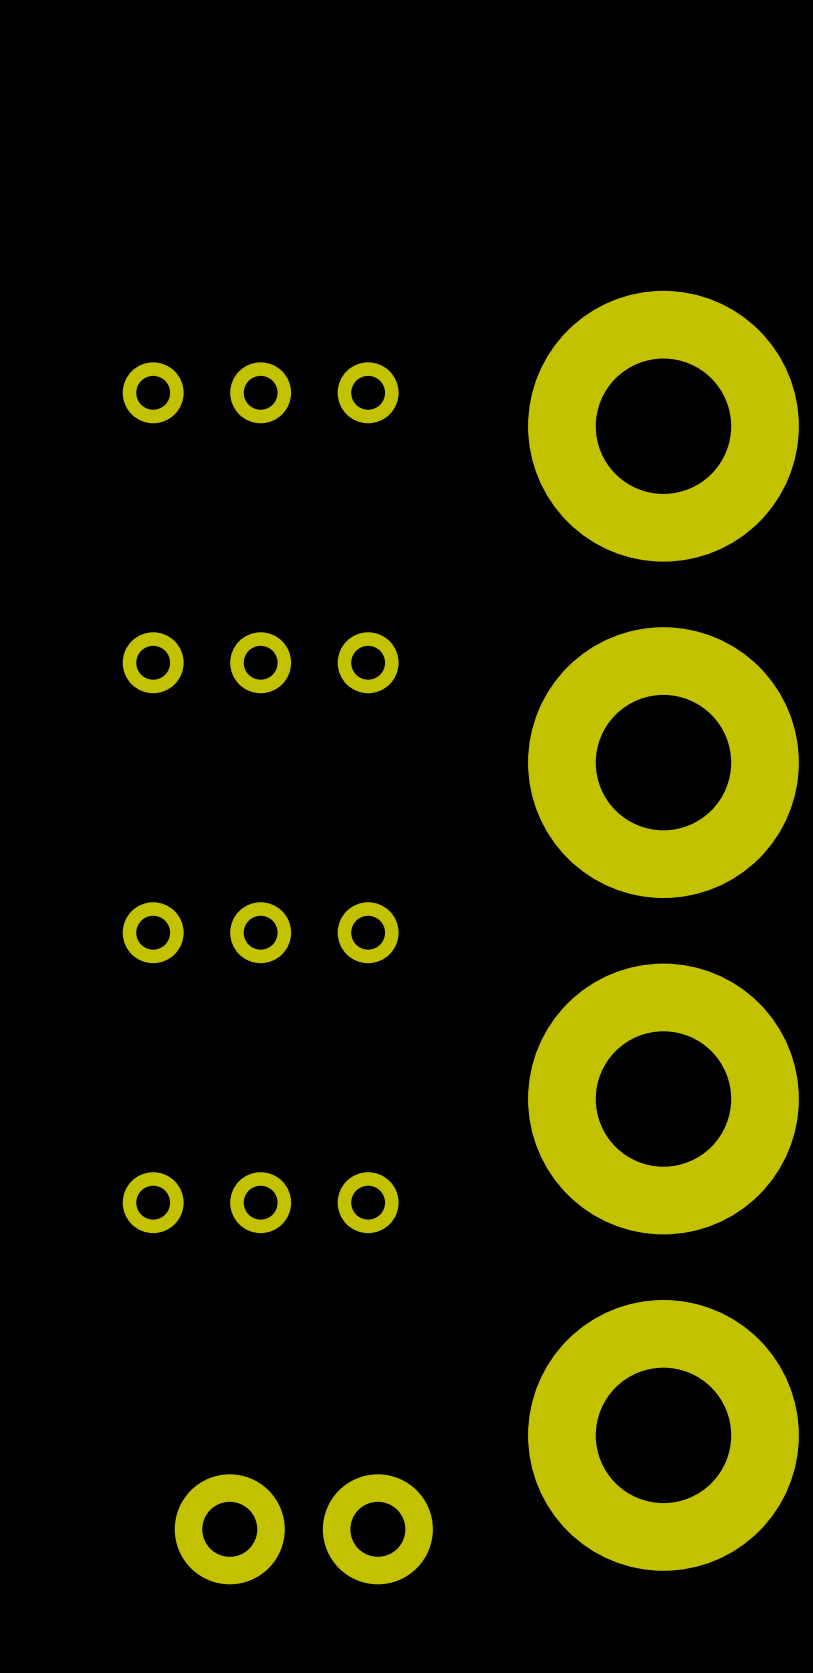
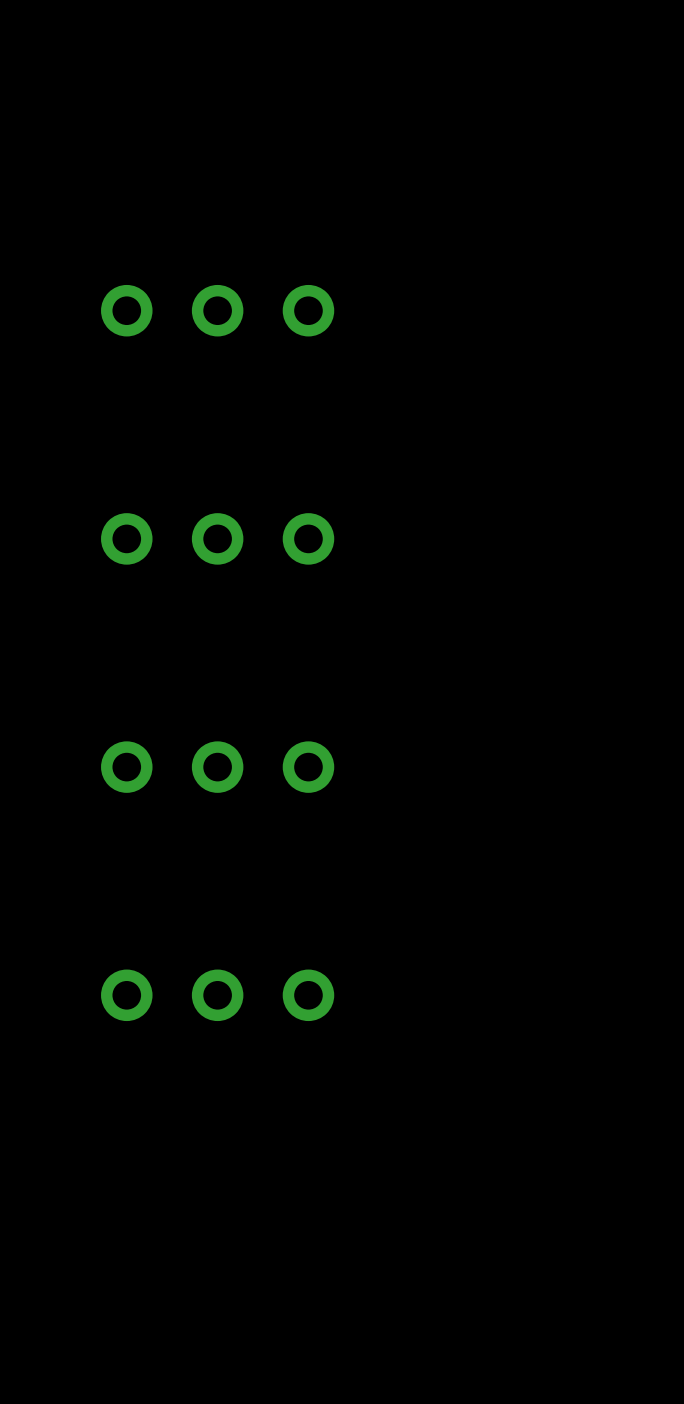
part: (663, 426) -> none
part: (663, 762) -> none
part: (663, 1099) -> none
part: (663, 1435) -> none
part: (303, 1529) -> none

